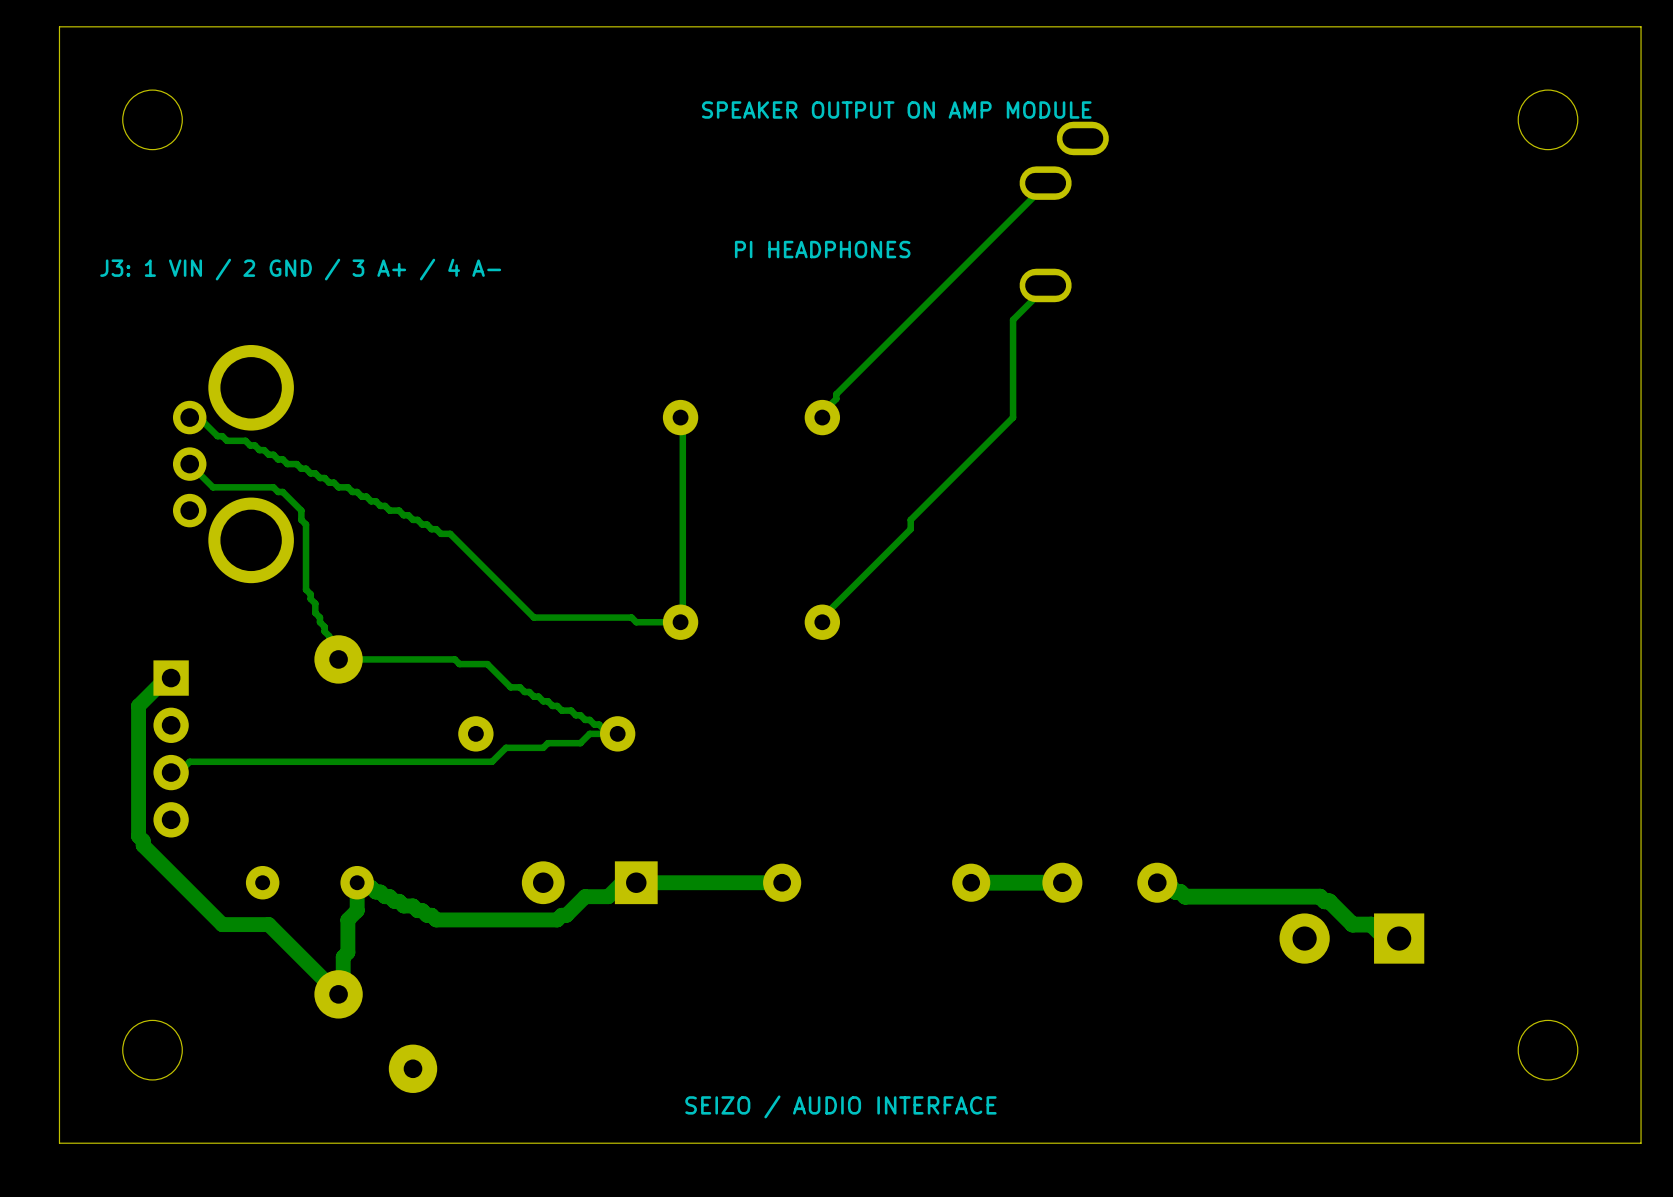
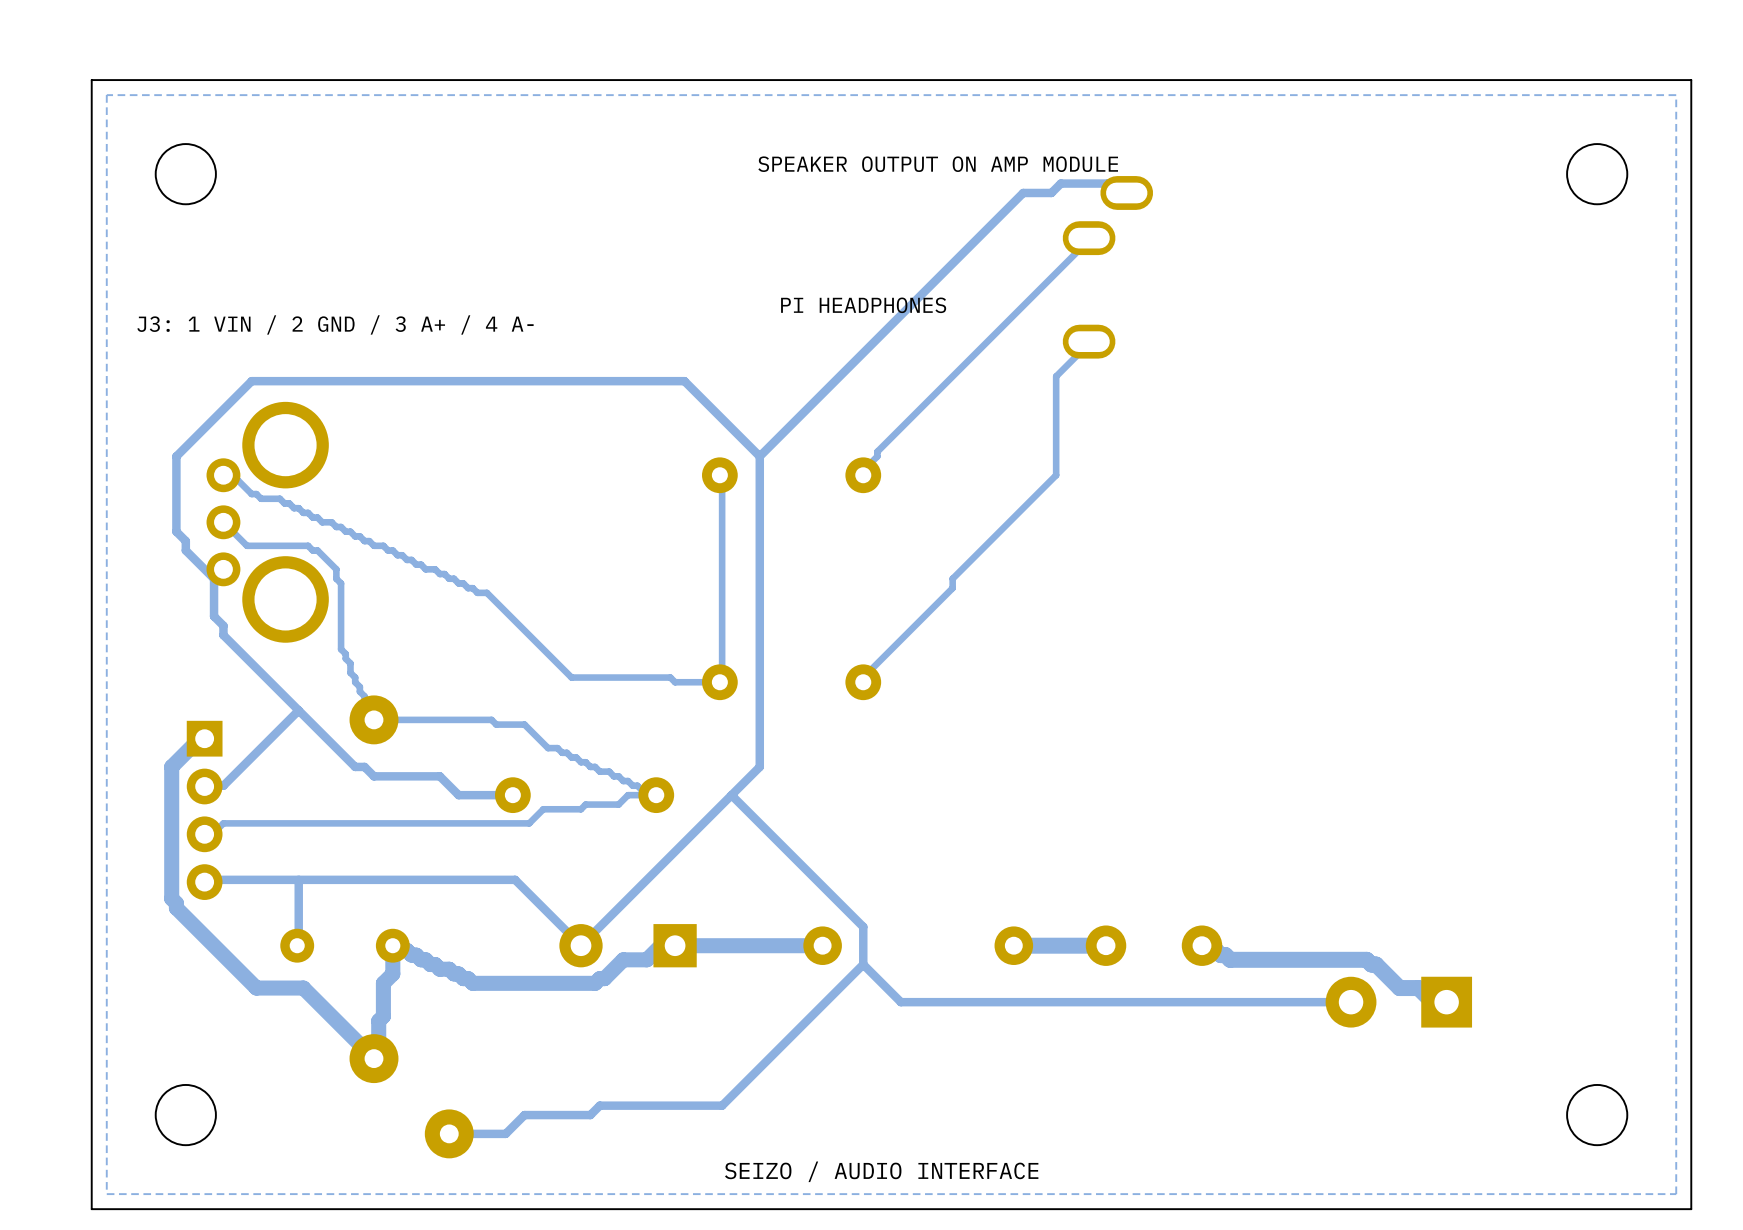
zone outline: none -> (1676, 95) (106, 95) (106, 1194) (1676, 1194) (1676, 95)
track: none -> (1126, 192) (1117, 192) (1107, 183) (1060, 183) (1051, 192) (1023, 192) (759, 456)
track: none -> (759, 456) (684, 381) (251, 381) (176, 456) (176, 531) (185, 541) (185, 550) (214, 578)
track: none -> (759, 456) (759, 766) (581, 945) (515, 879) (204, 879) (204, 882)
track: none -> (214, 578) (214, 616) (223, 625) (223, 635) (355, 766) (364, 766) (374, 776) (439, 776) (458, 795) (515, 795)
track: none -> (298, 710) (223, 785) (204, 786)
track: none -> (731, 795) (863, 926) (863, 964)
track: none -> (298, 879) (298, 945) (297, 945)
track: none -> (863, 964) (722, 1105) (599, 1105) (590, 1115) (524, 1115) (505, 1133) (449, 1133)
track: none -> (863, 964) (900, 1002) (1352, 1002)

